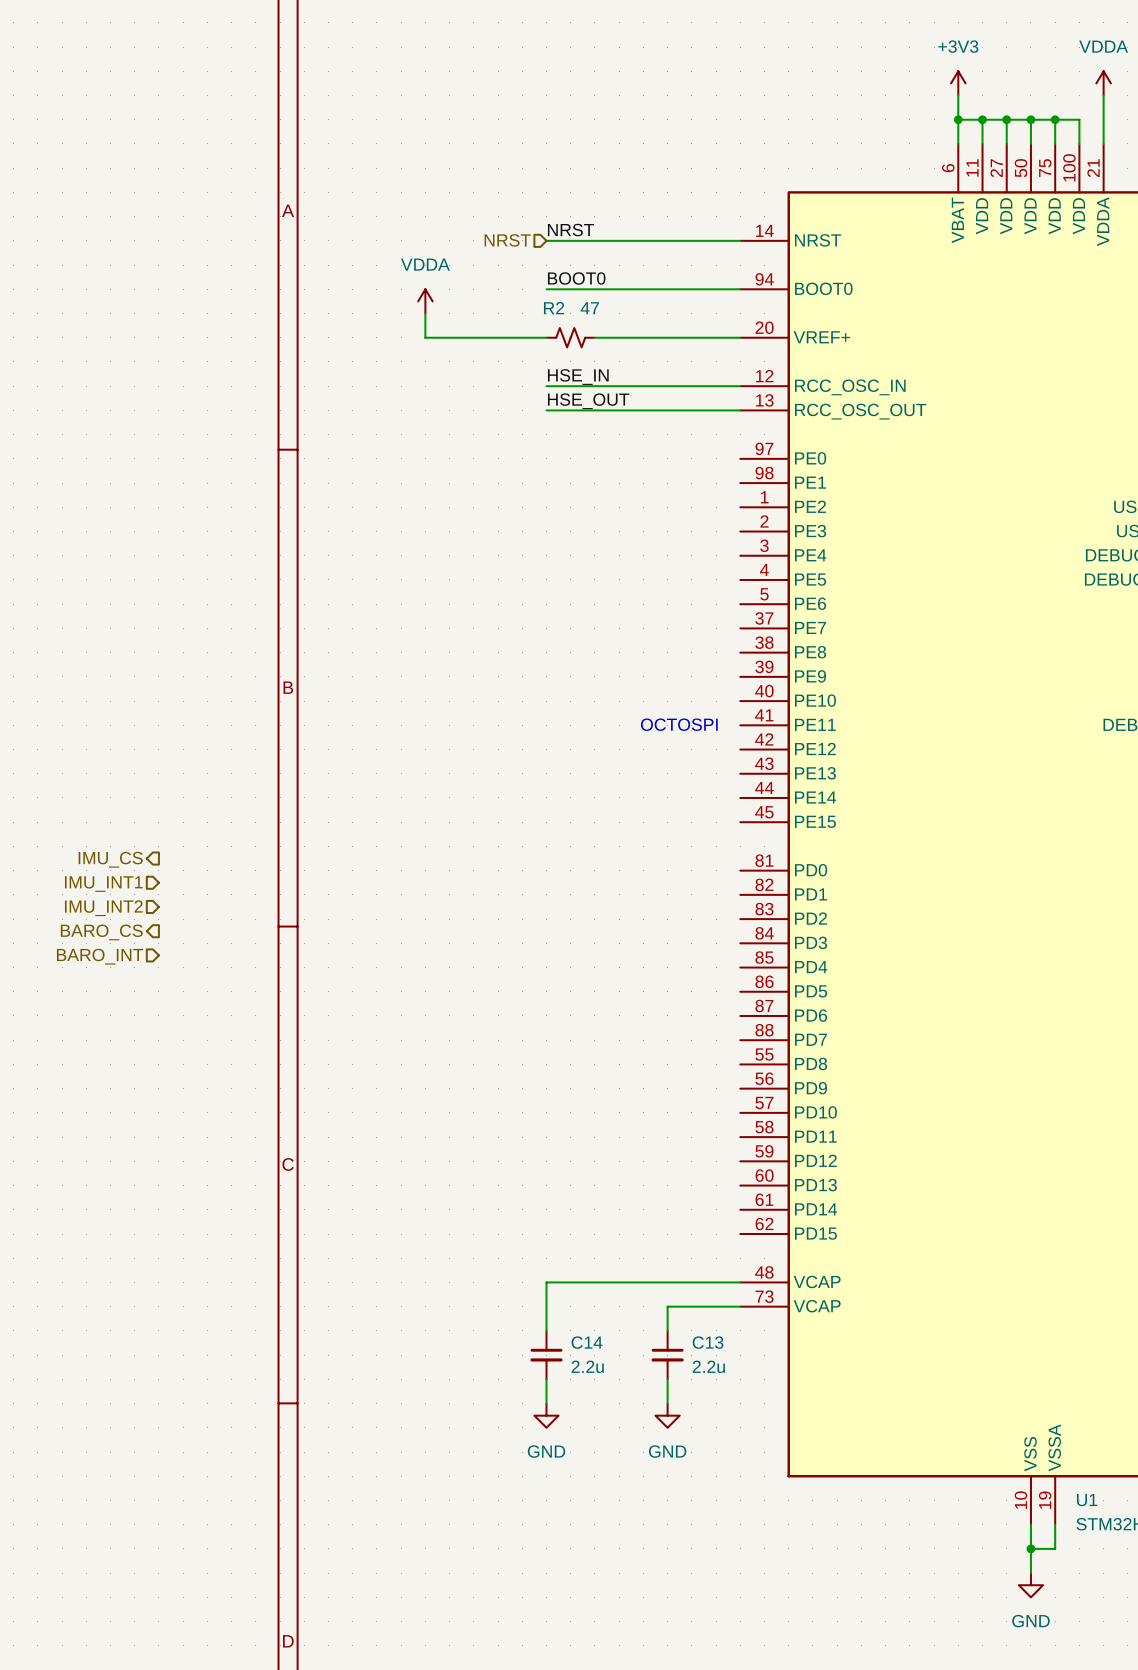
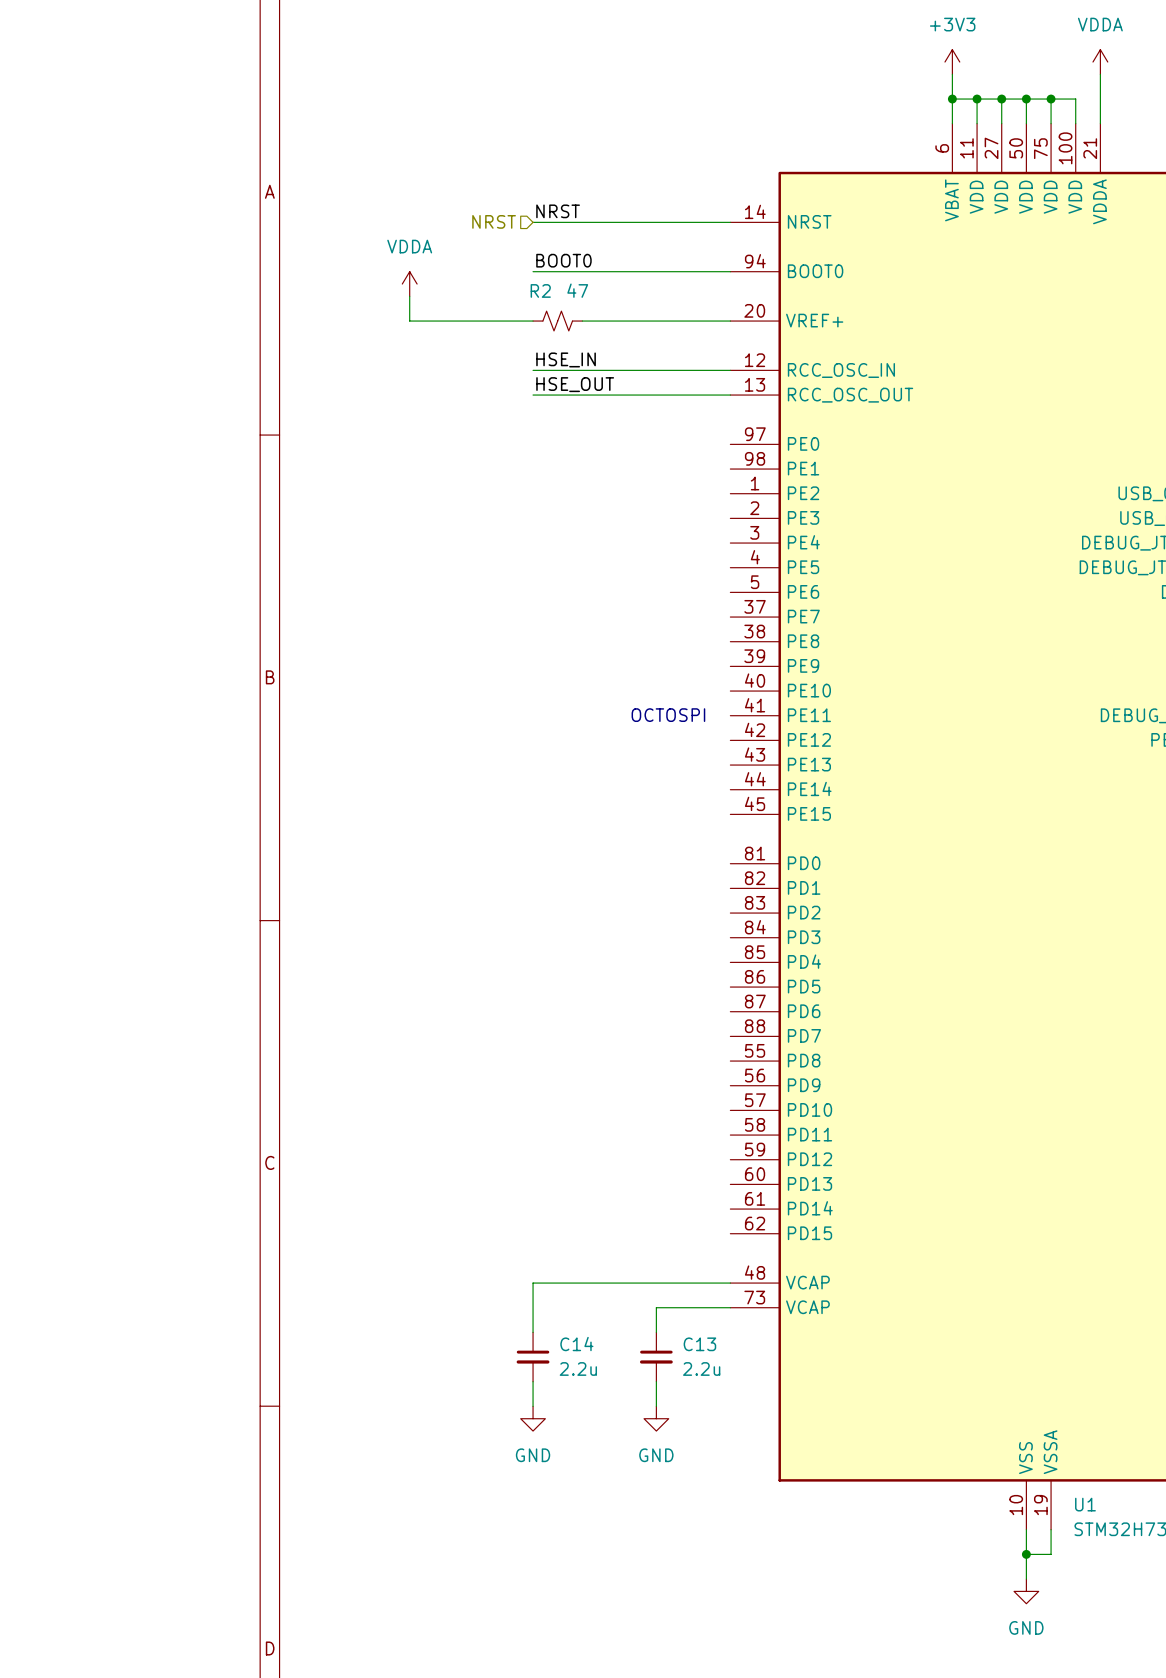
hierarchical label: IMU_CS (110, 859) -> none
hierarchical label: IMU_INT1 (103, 884) -> none
hierarchical label: IMU_INT2 (103, 908) -> none
hierarchical label: BARO_CS (101, 932) -> none
hierarchical label: BARO_INT (100, 956) -> none

